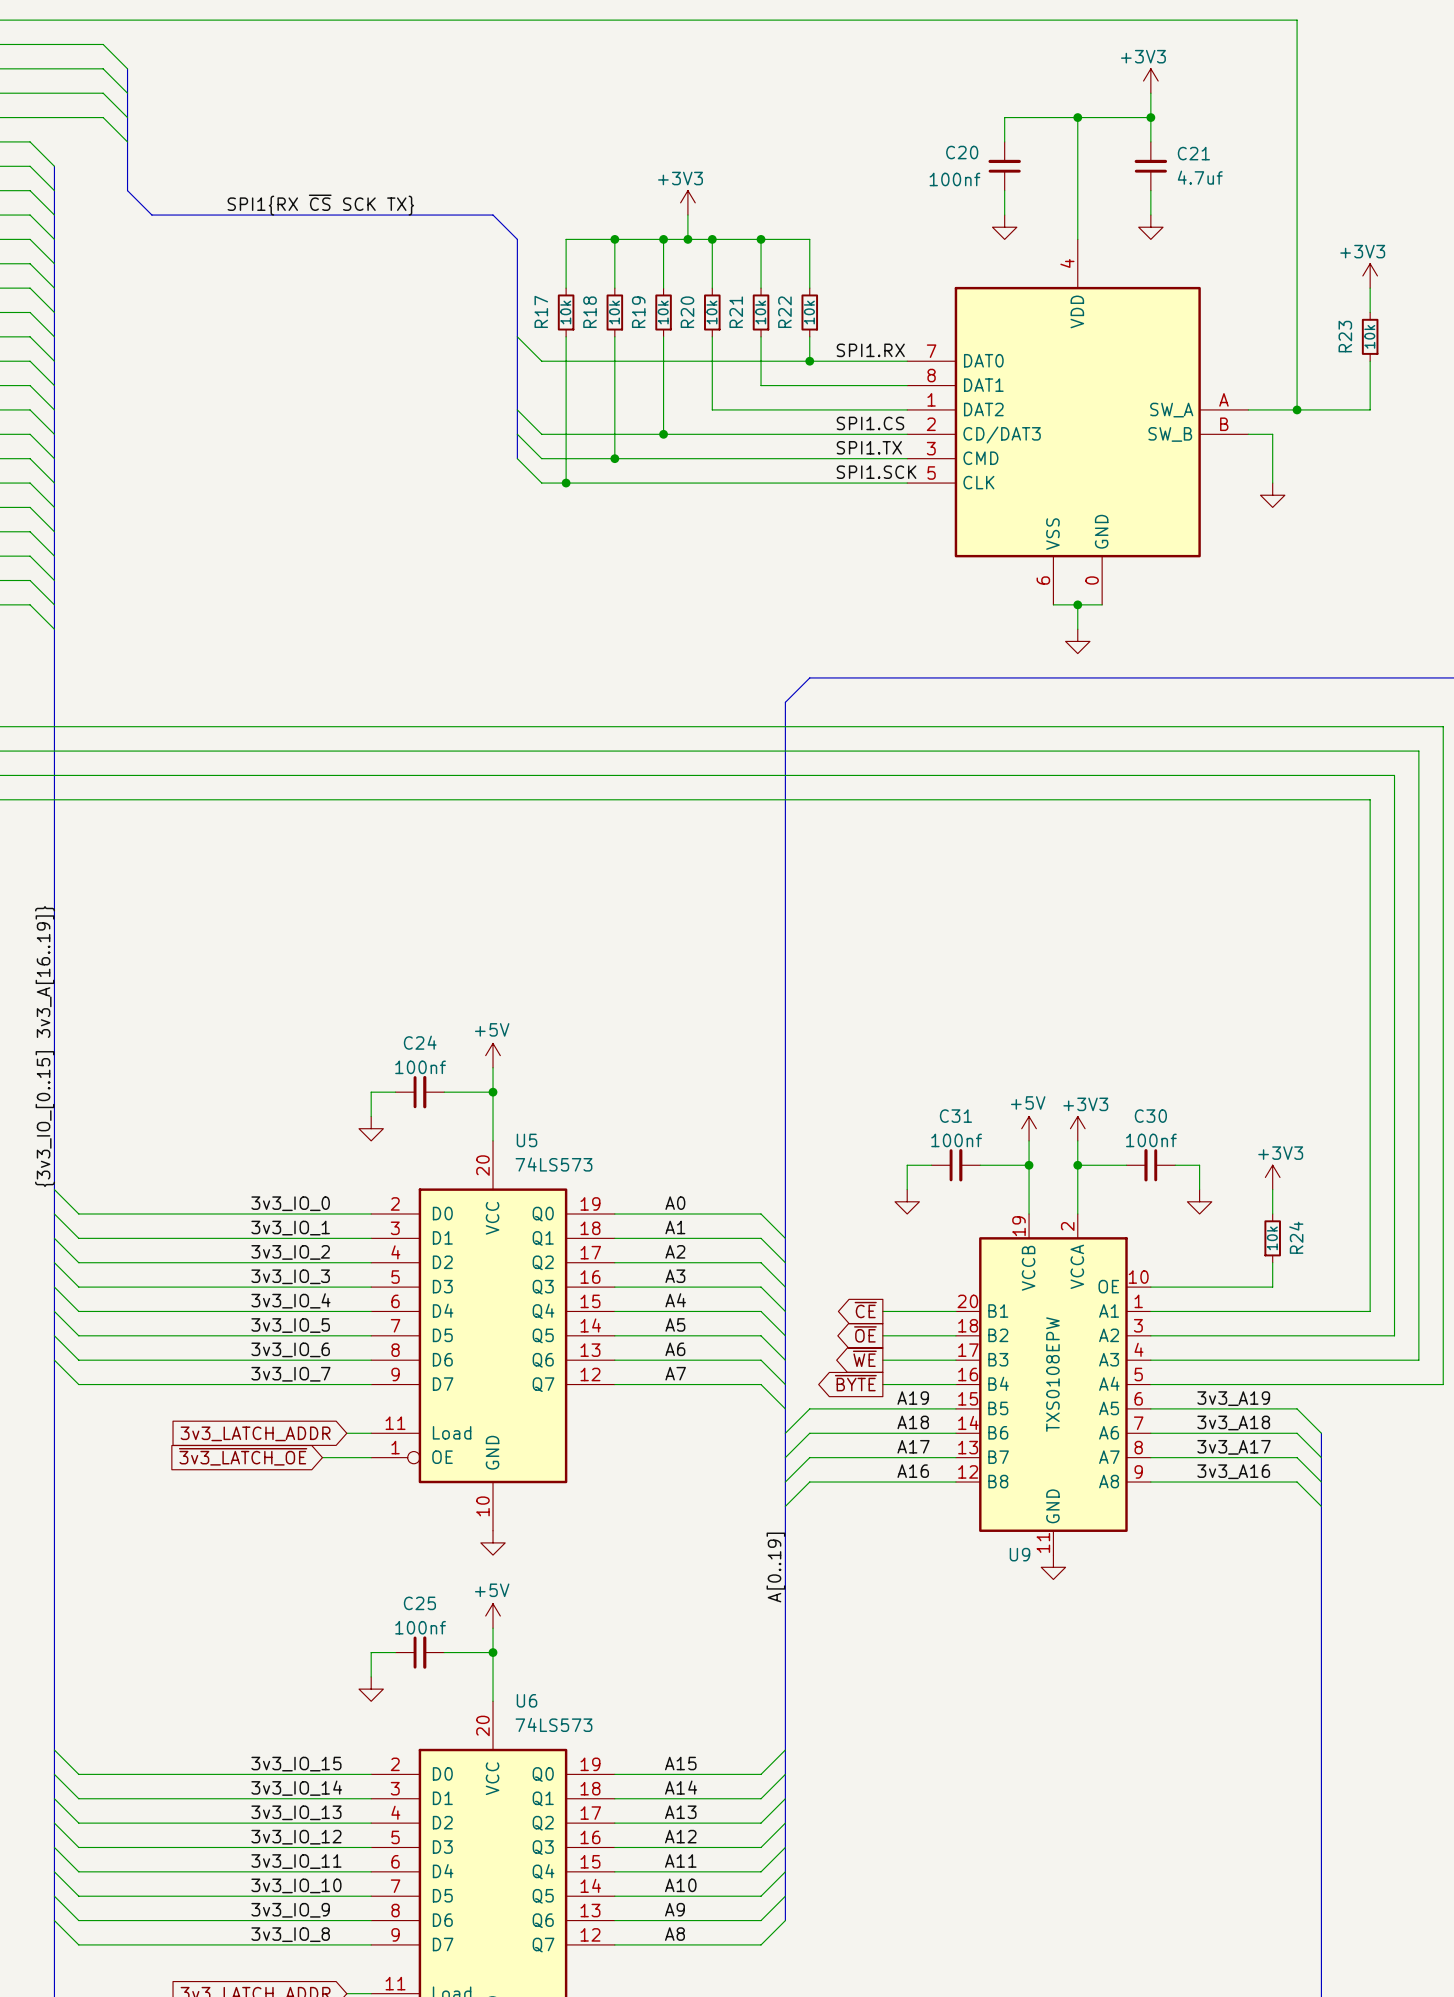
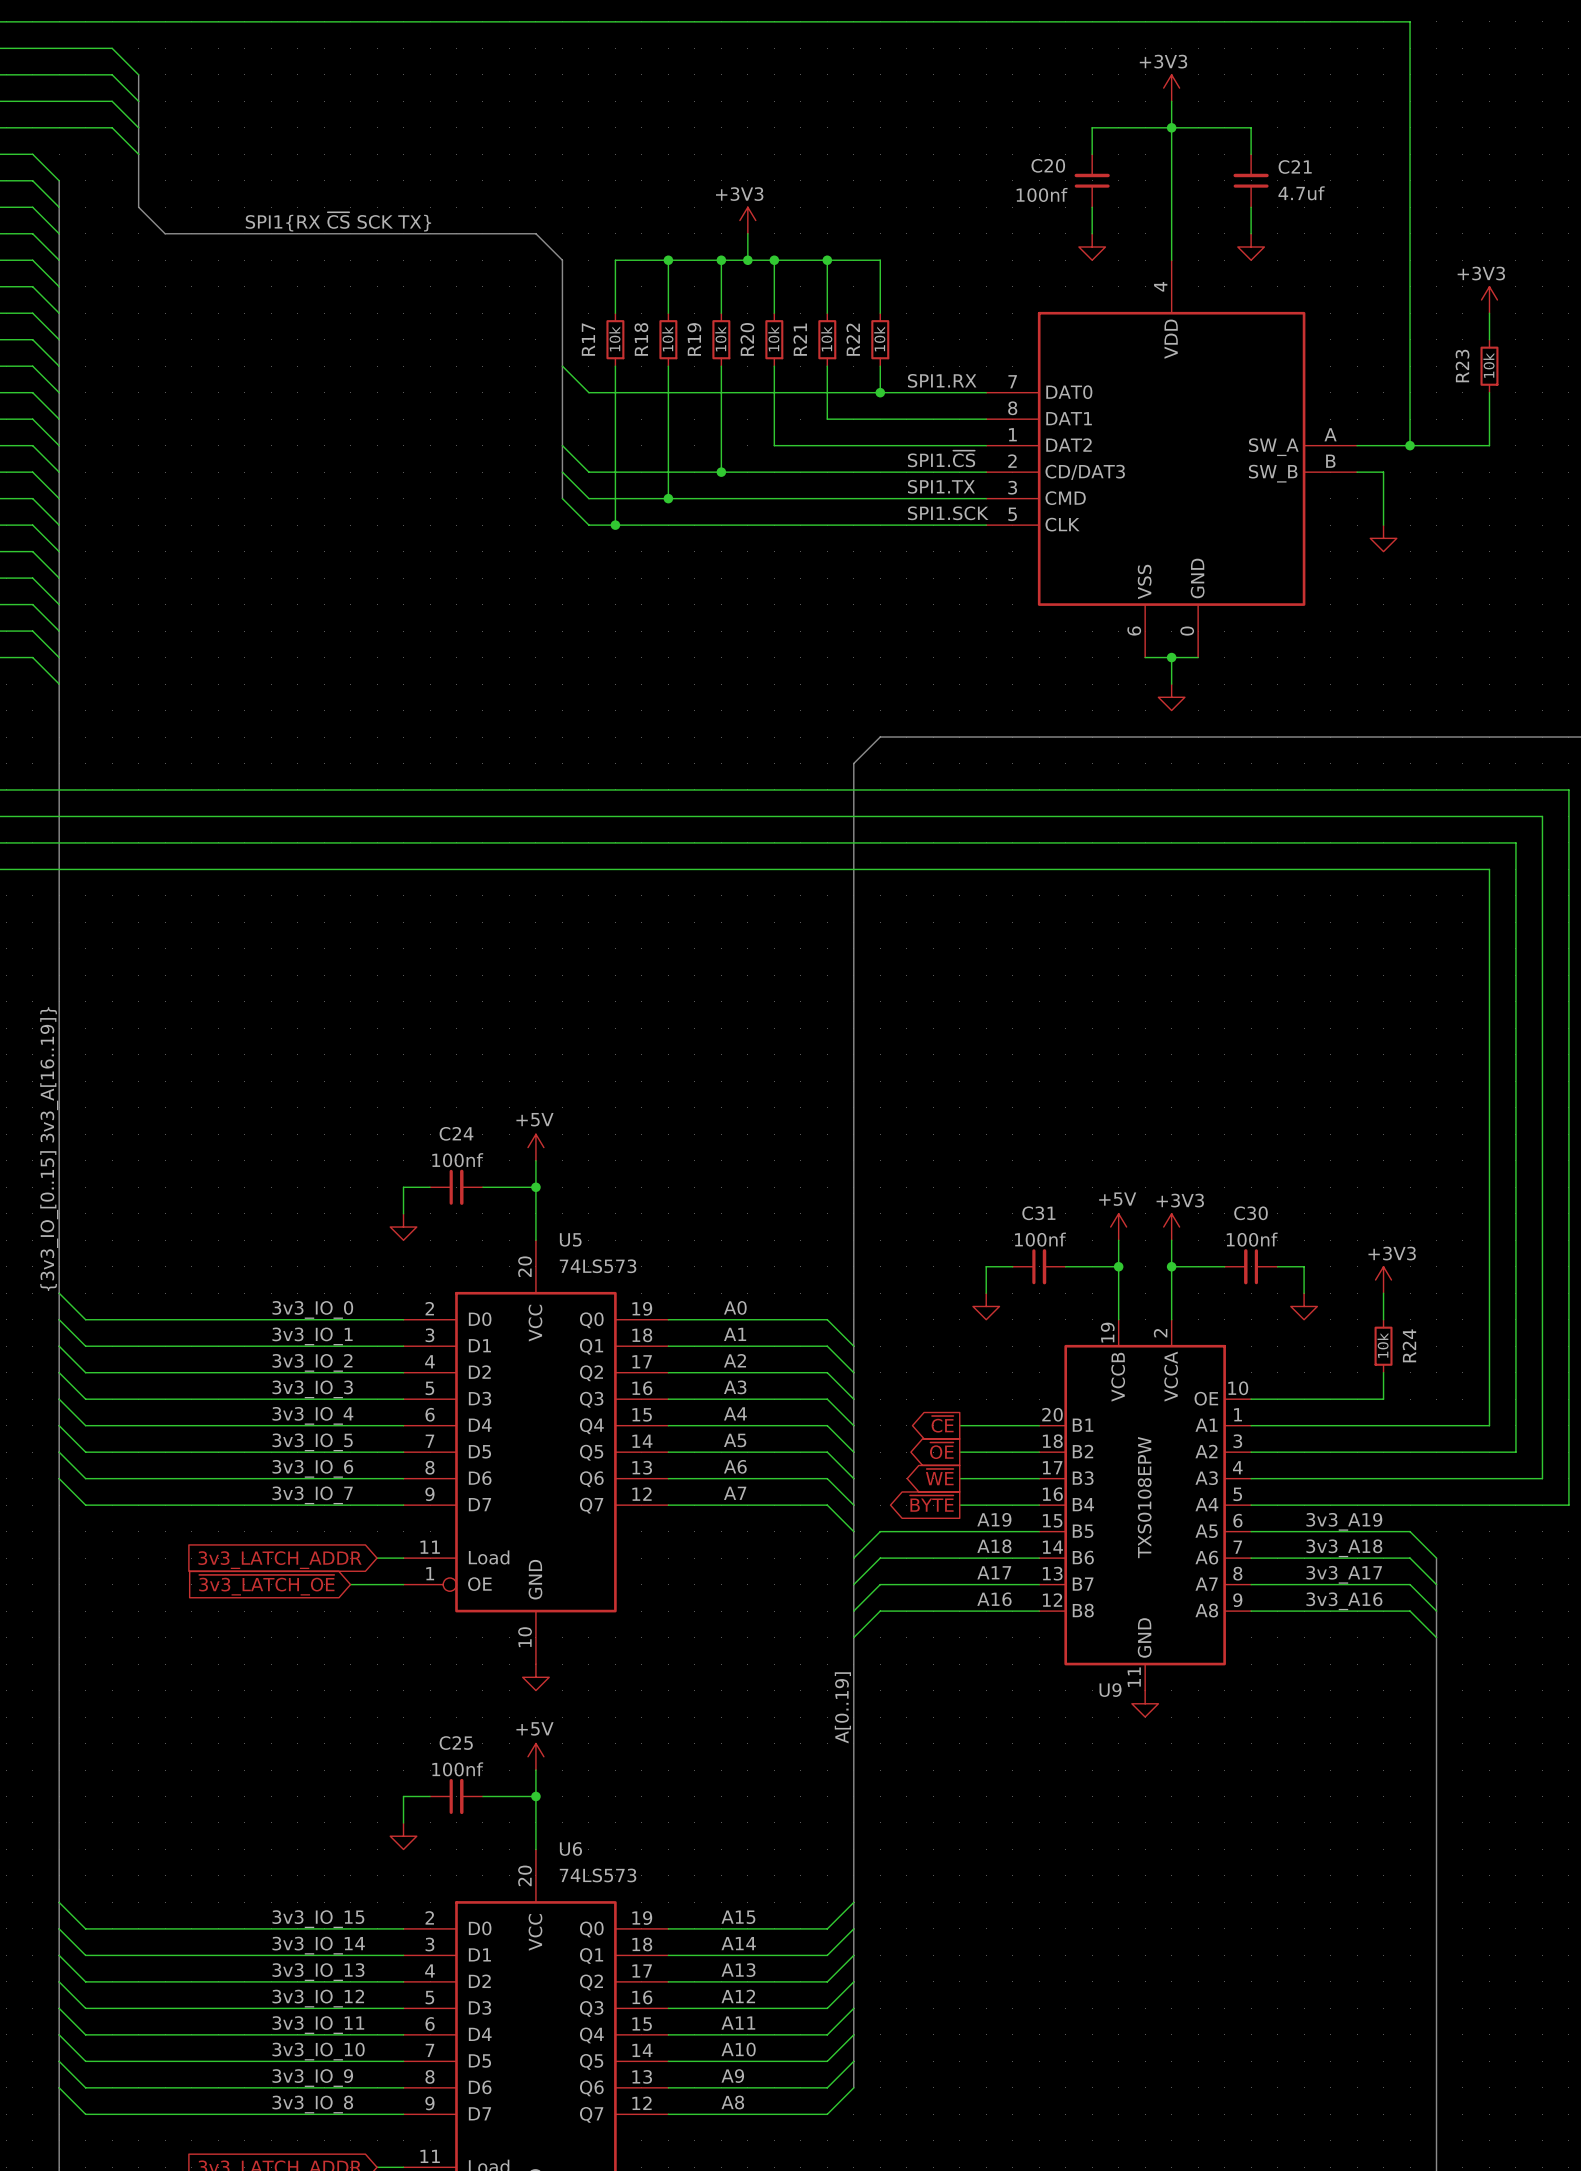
power symbol position: +3V3 (1150, 81) -> +3V3 (1171, 88)
wire: (1150, 93) (1150, 117) -> (1171, 101) (1171, 127)
junction: (1150, 117) -> none
label: SPI1.CS (870, 423) -> SPI1.~{CS} (941, 458)

